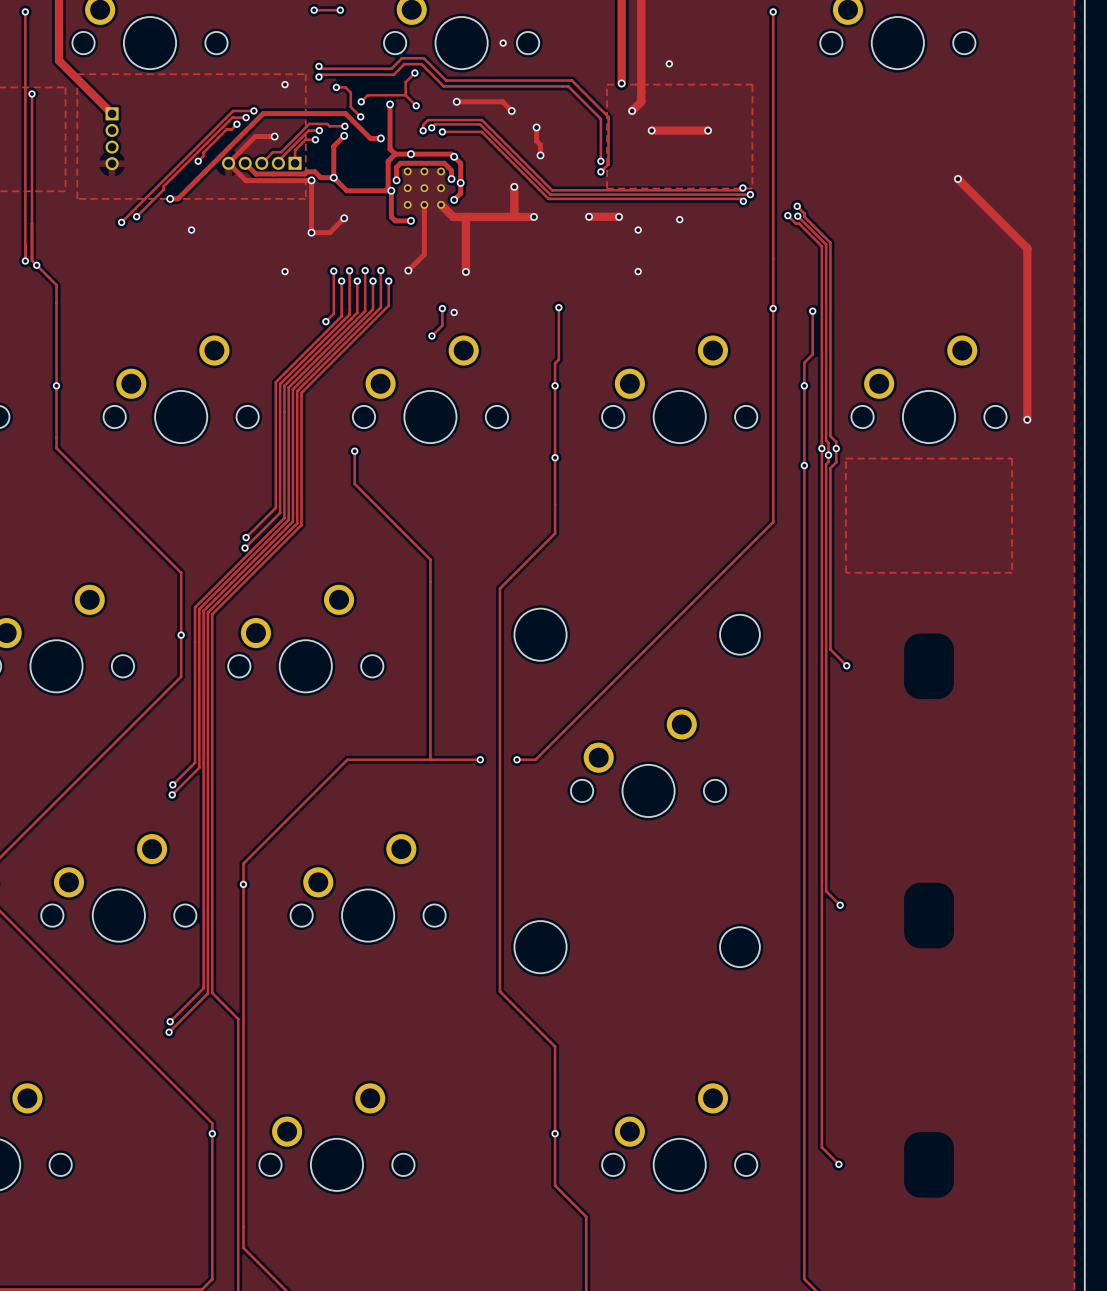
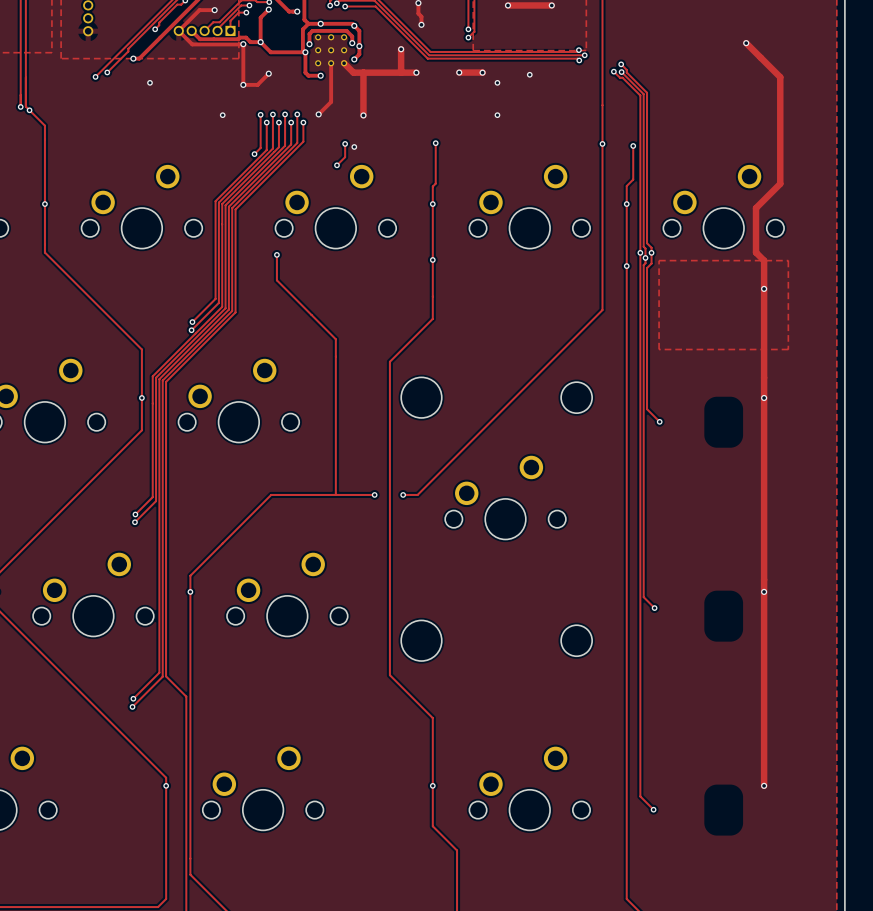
track: (1001, 222) (1027, 248) (1027, 419) -> (780, 77) (780, 183) (756, 208) (756, 252) (764, 260) (764, 785)
via: (1027, 419) -> none
via: none -> (764, 288)
via: none -> (764, 397)
via: none -> (764, 591)
via: none -> (764, 785)

